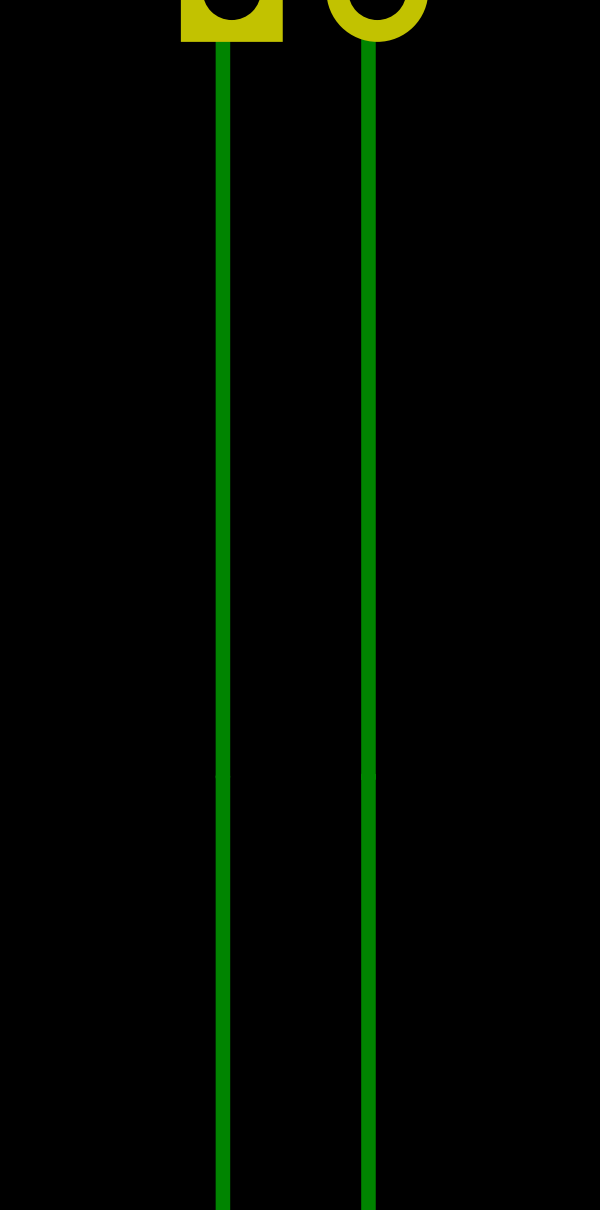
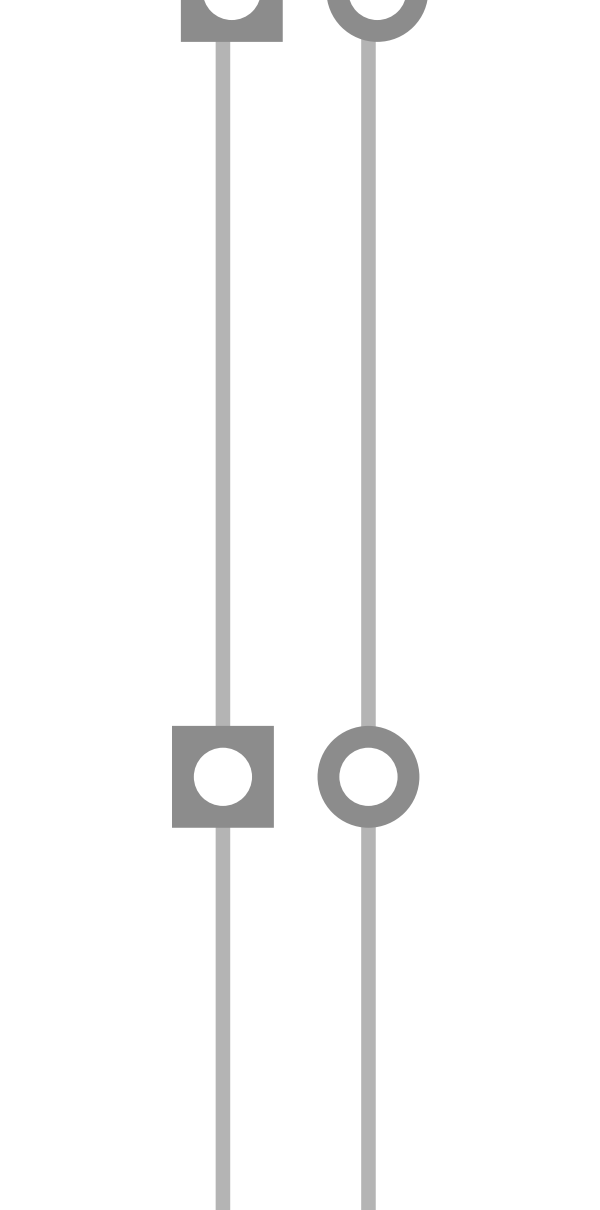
part: none -> (295, 776)

